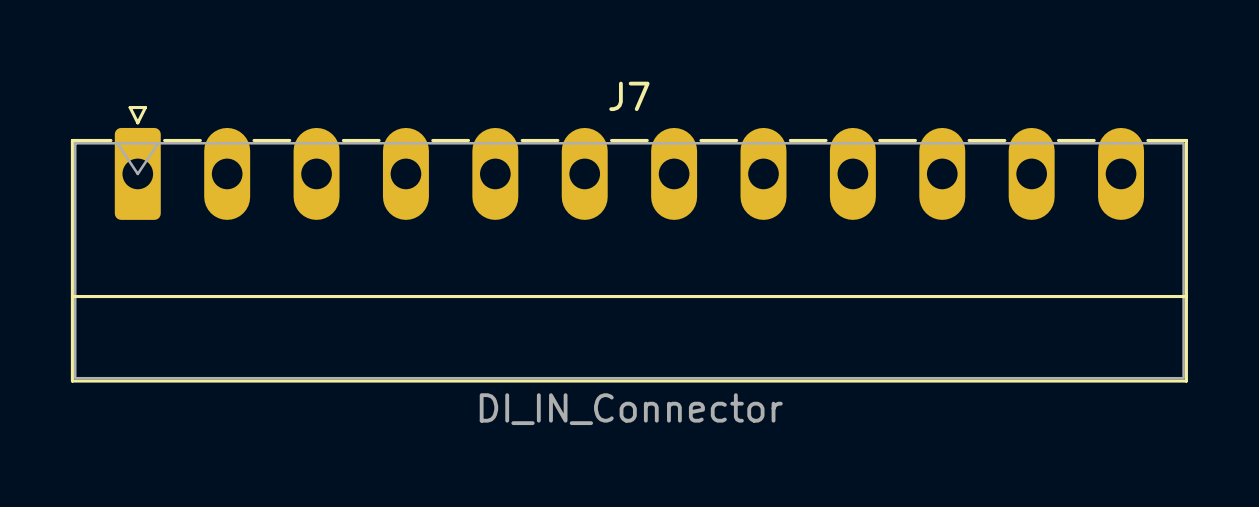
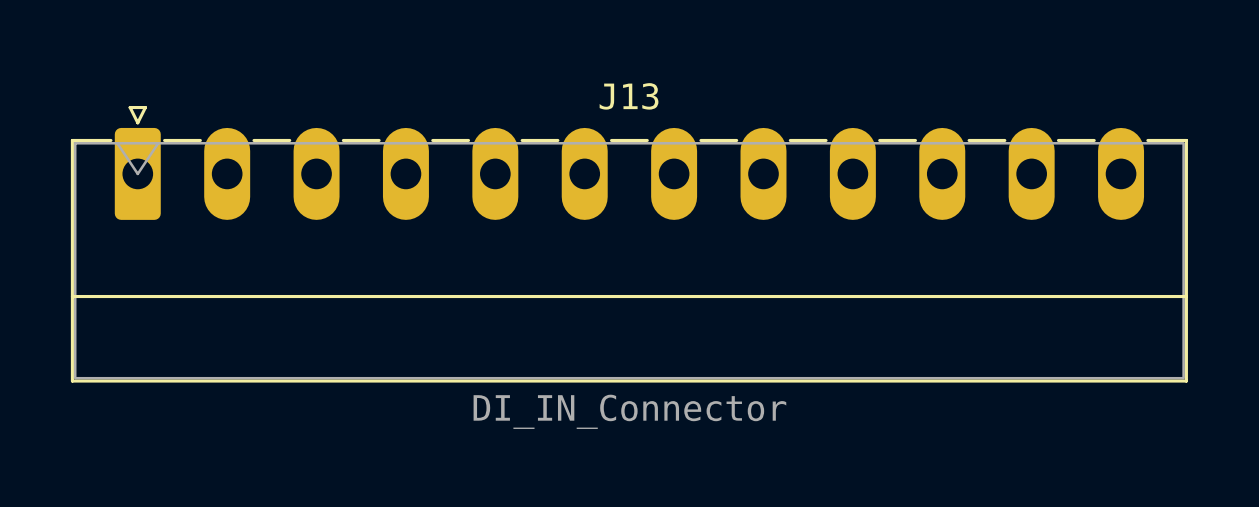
J7 name: J7 (629, 96) -> J13 (629, 96)

